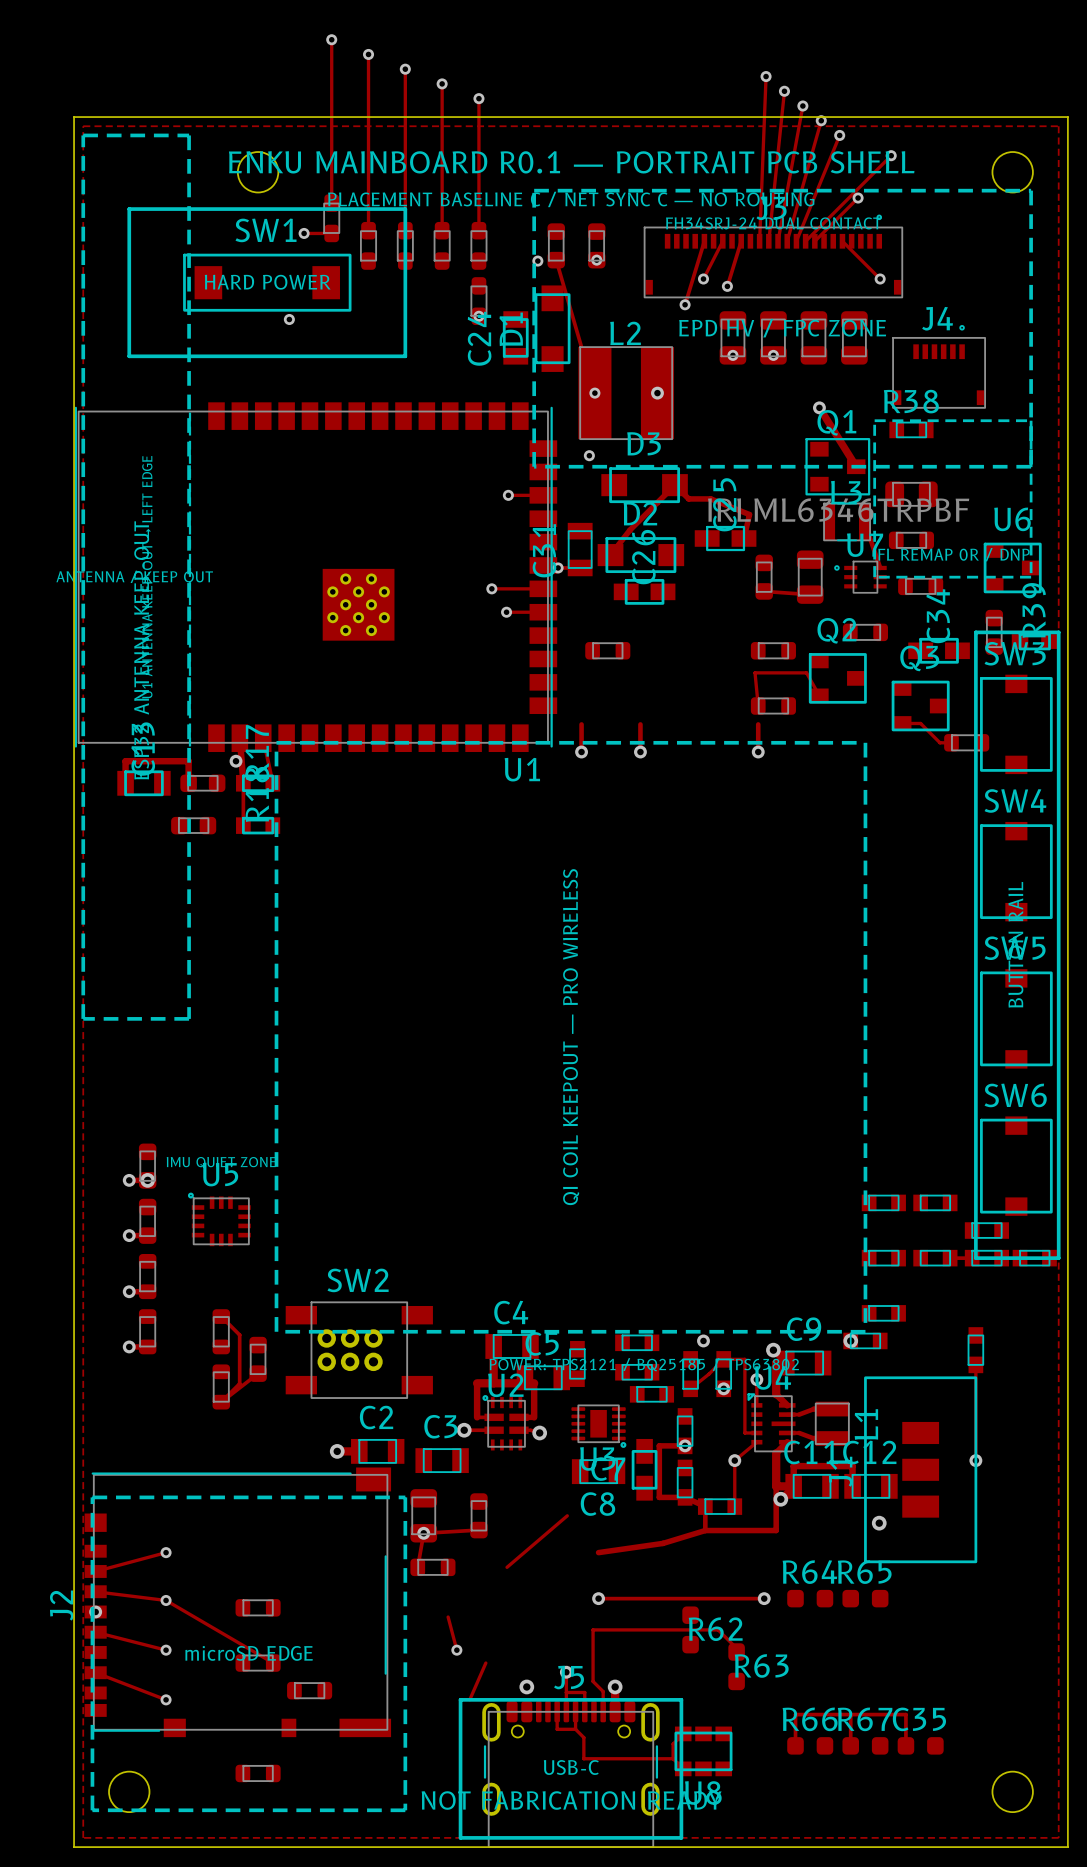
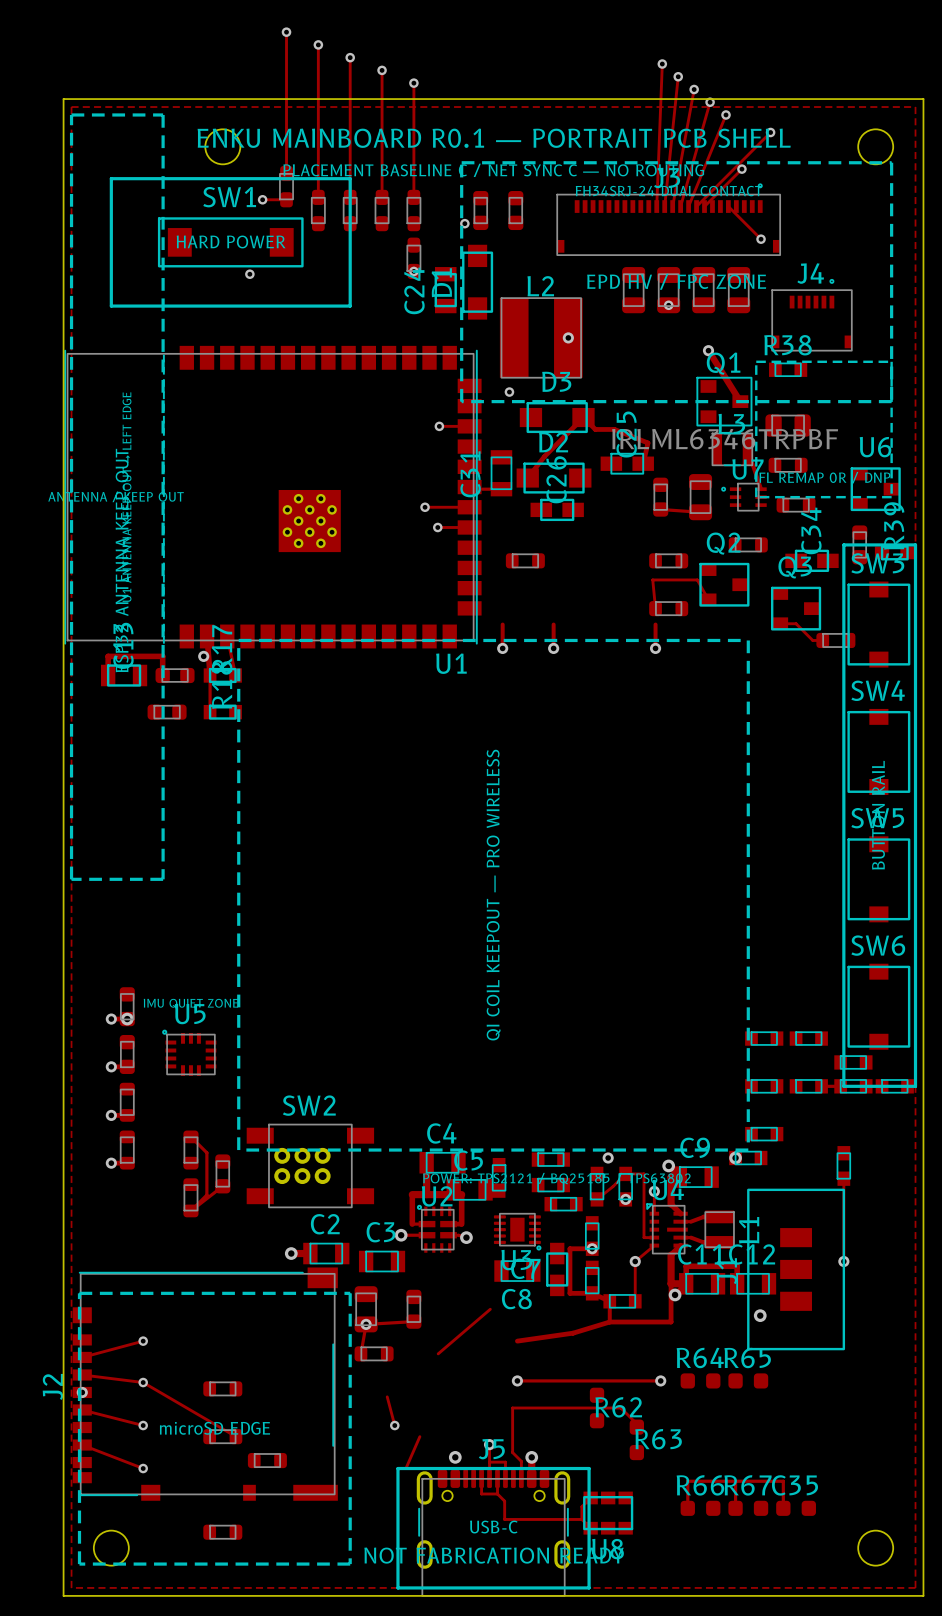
track: (704, 241) (685, 304) -> none
track: (722, 241) (703, 279) -> none
track: (741, 241) (727, 286) -> none
track: (556, 260) (594, 393) -> none
via: (596, 260) -> none
via: (703, 279) -> none
via: (727, 286) -> none
via: (685, 304) -> none
via: (732, 355) -> none
via: (594, 393) -> none
via: (558, 567) -> none

